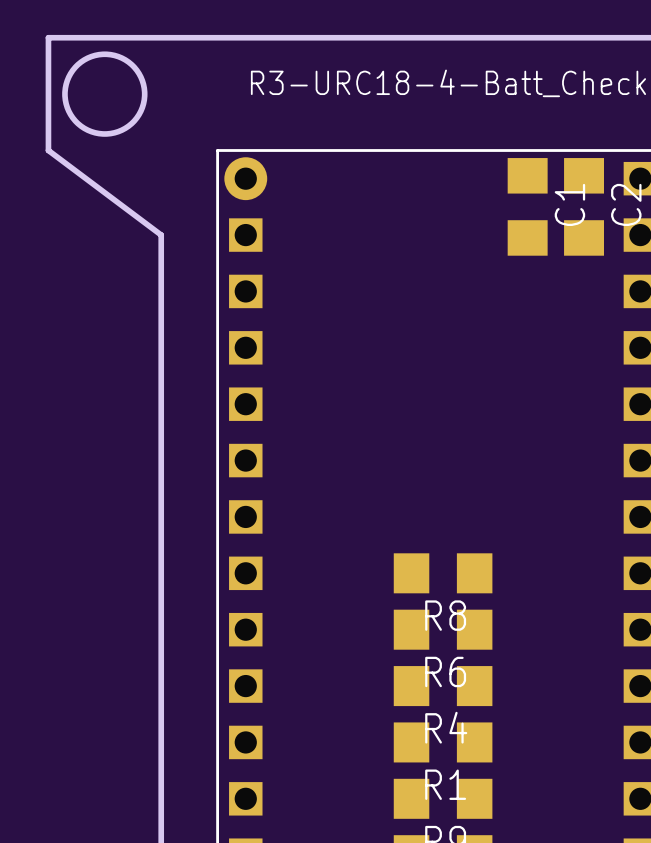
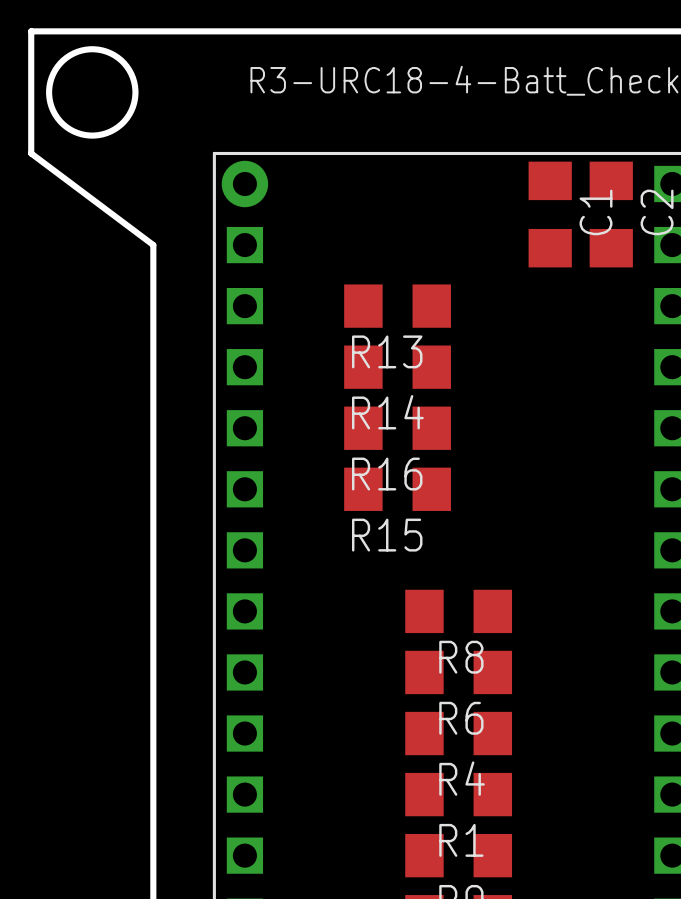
R13: none -> (397, 306)
R14: none -> (397, 367)
R16: none -> (397, 428)
R15: none -> (397, 489)

